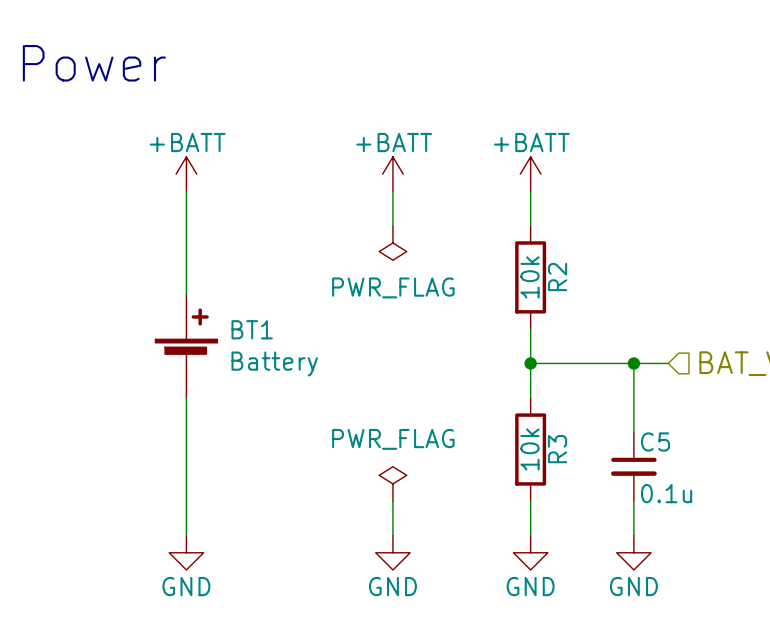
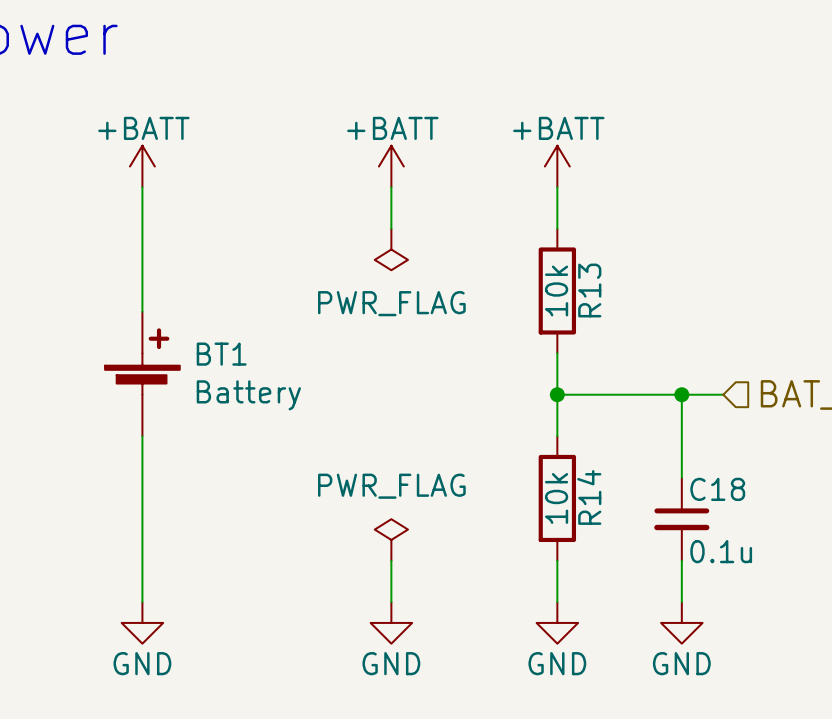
R2 name: R2 (557, 276) -> R13 (589, 290)
C5 name: C5 (655, 441) -> C18 (717, 489)
R3 name: R3 (557, 449) -> R14 (589, 497)

